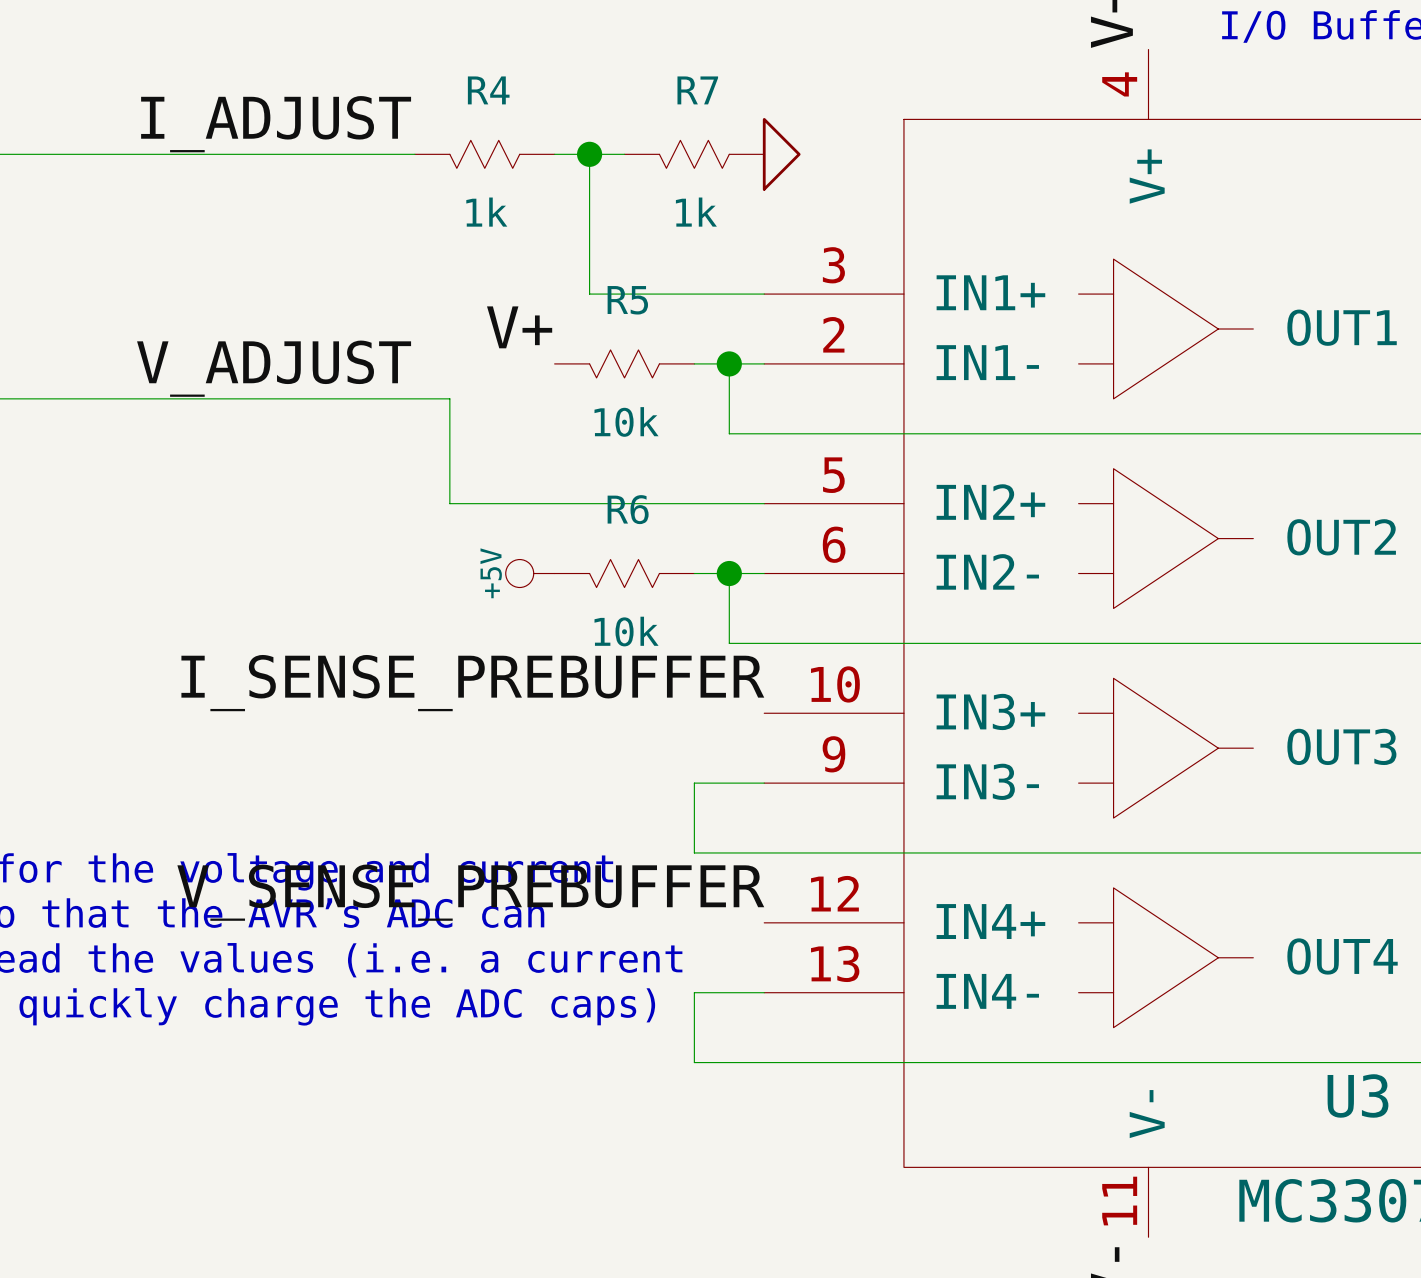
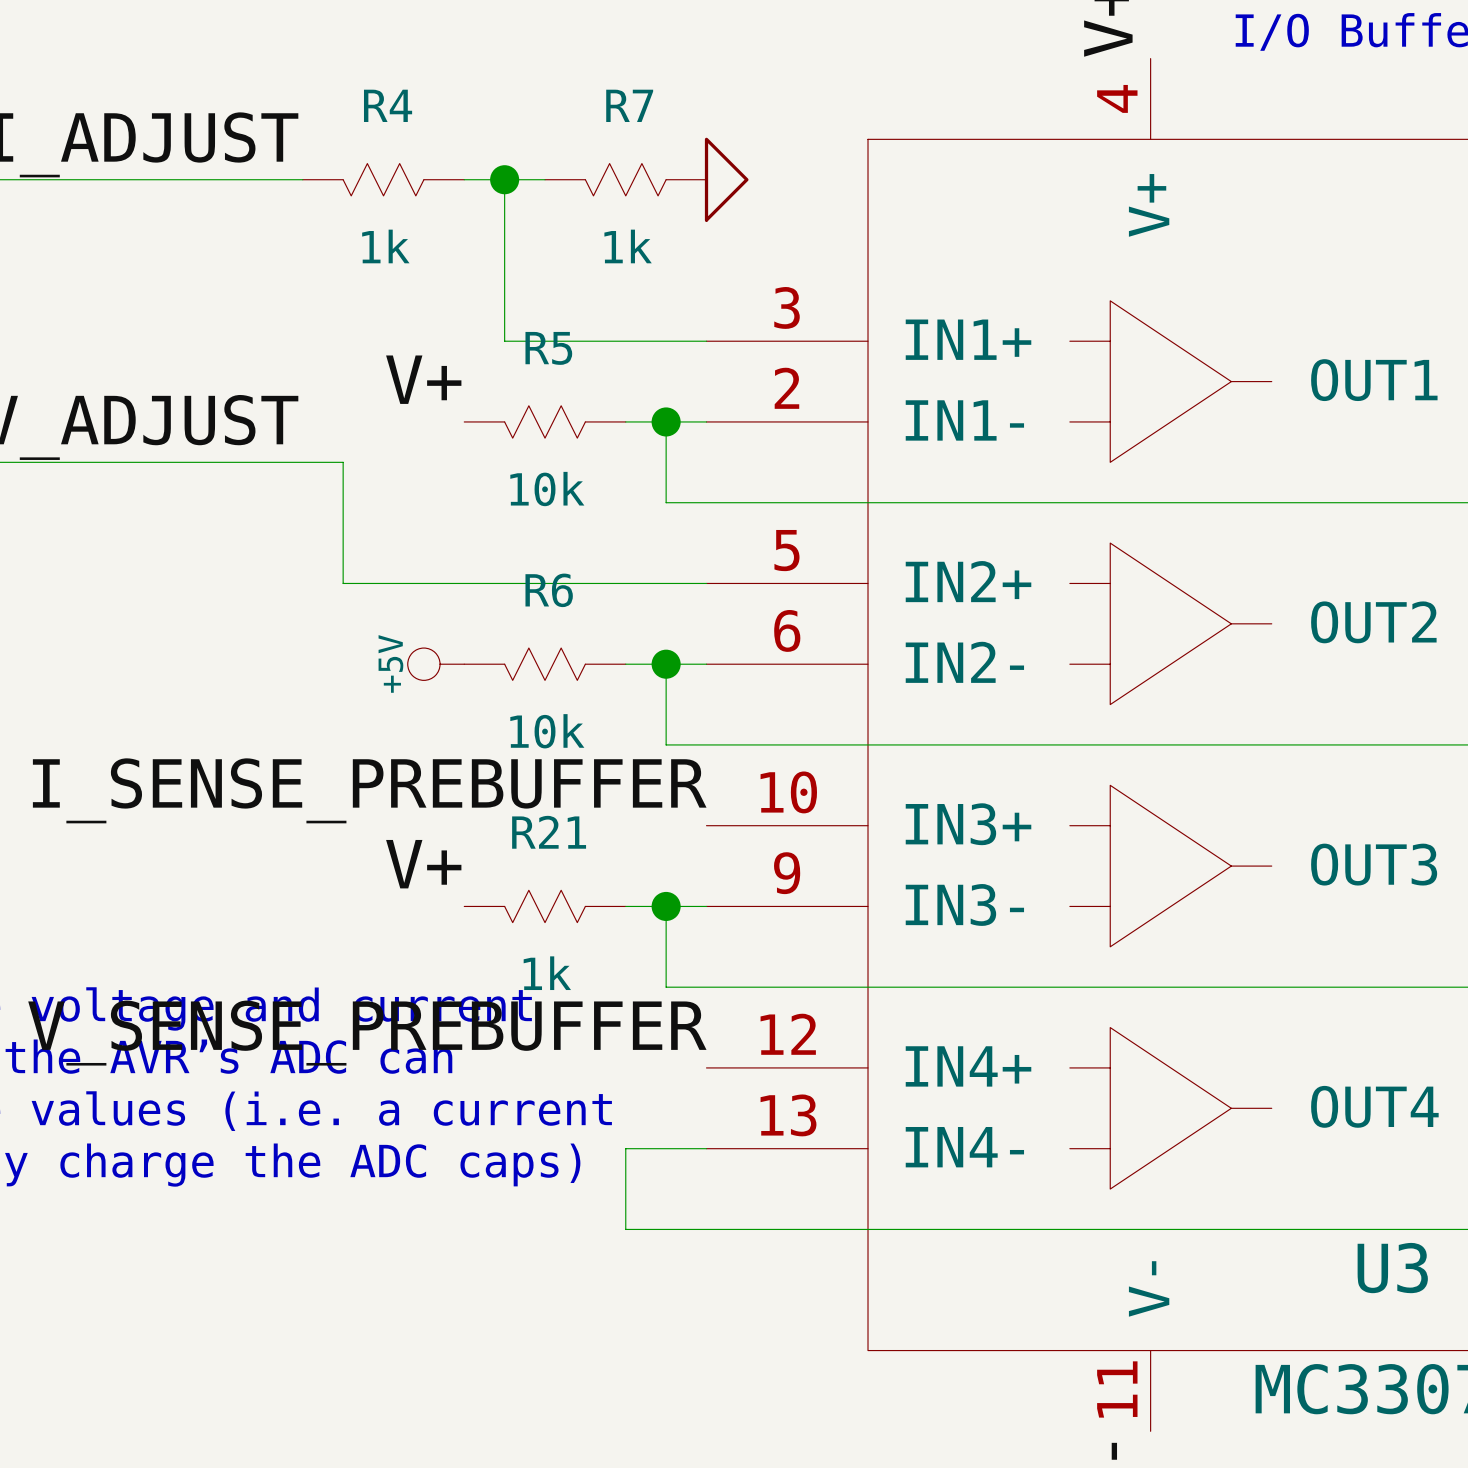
label: none -> V+ (423, 864)
R21: none -> 1k (545, 906)
wire: (694, 783) (694, 852) (729, 852) -> (666, 906) (666, 987)
junction: none -> (666, 906)

